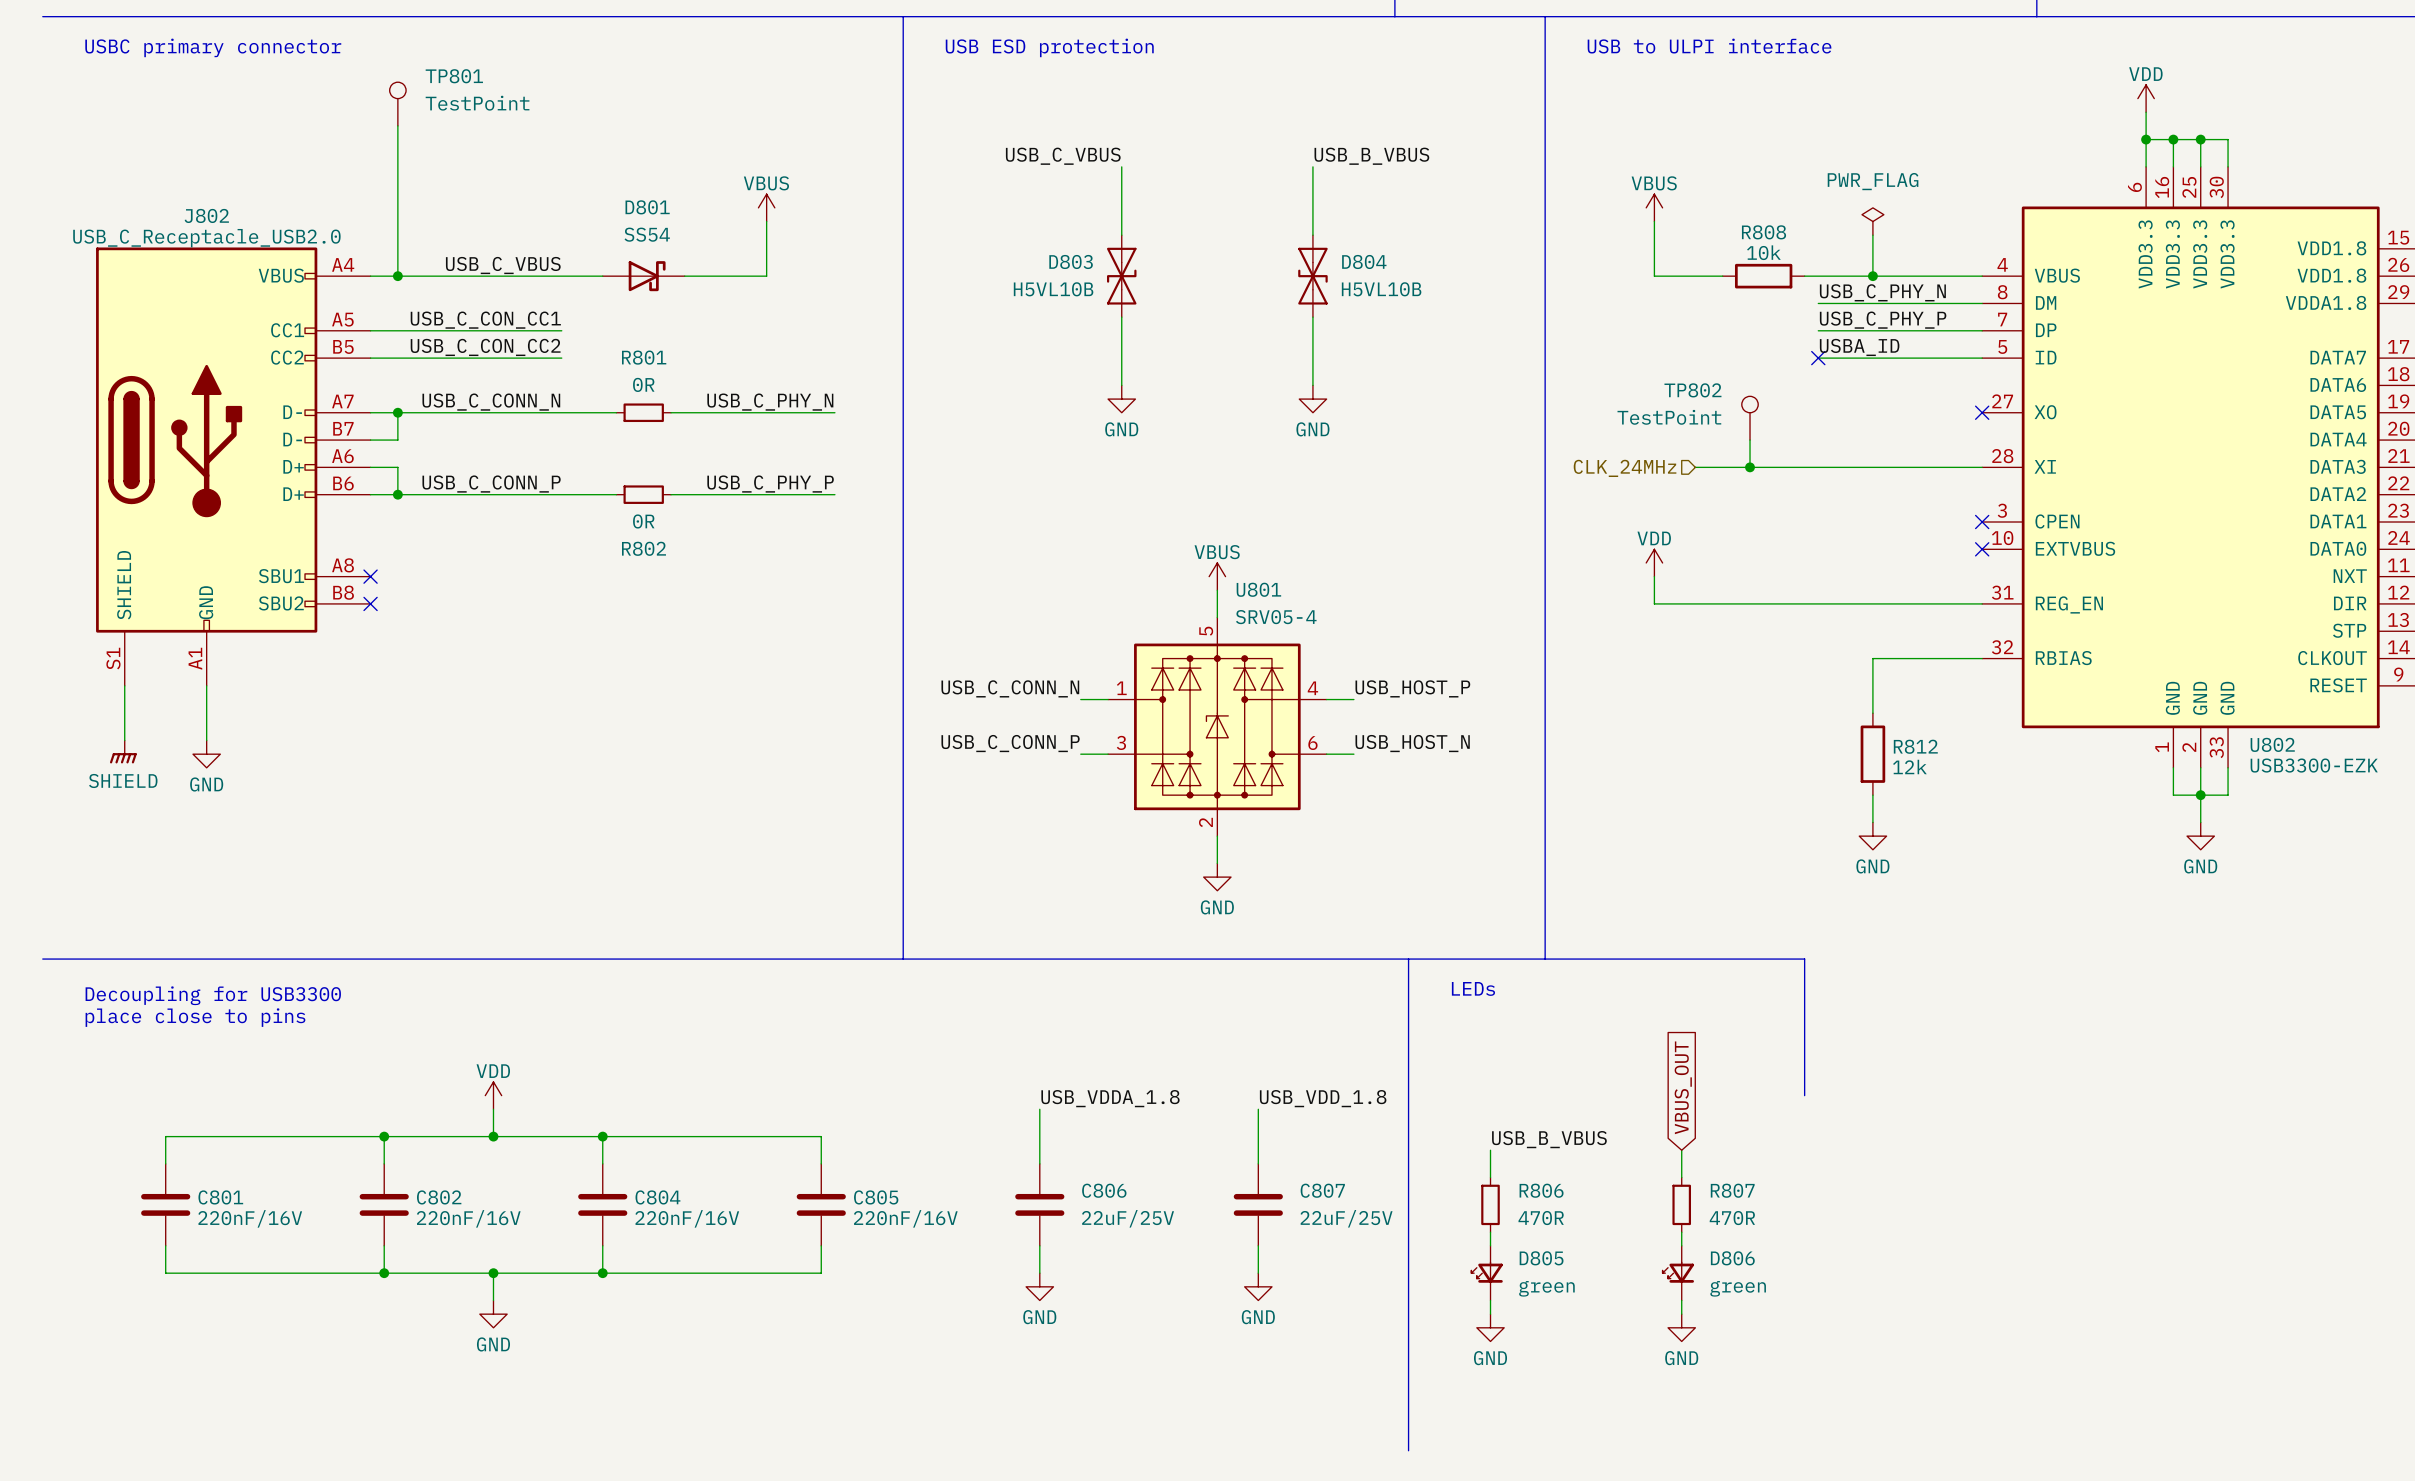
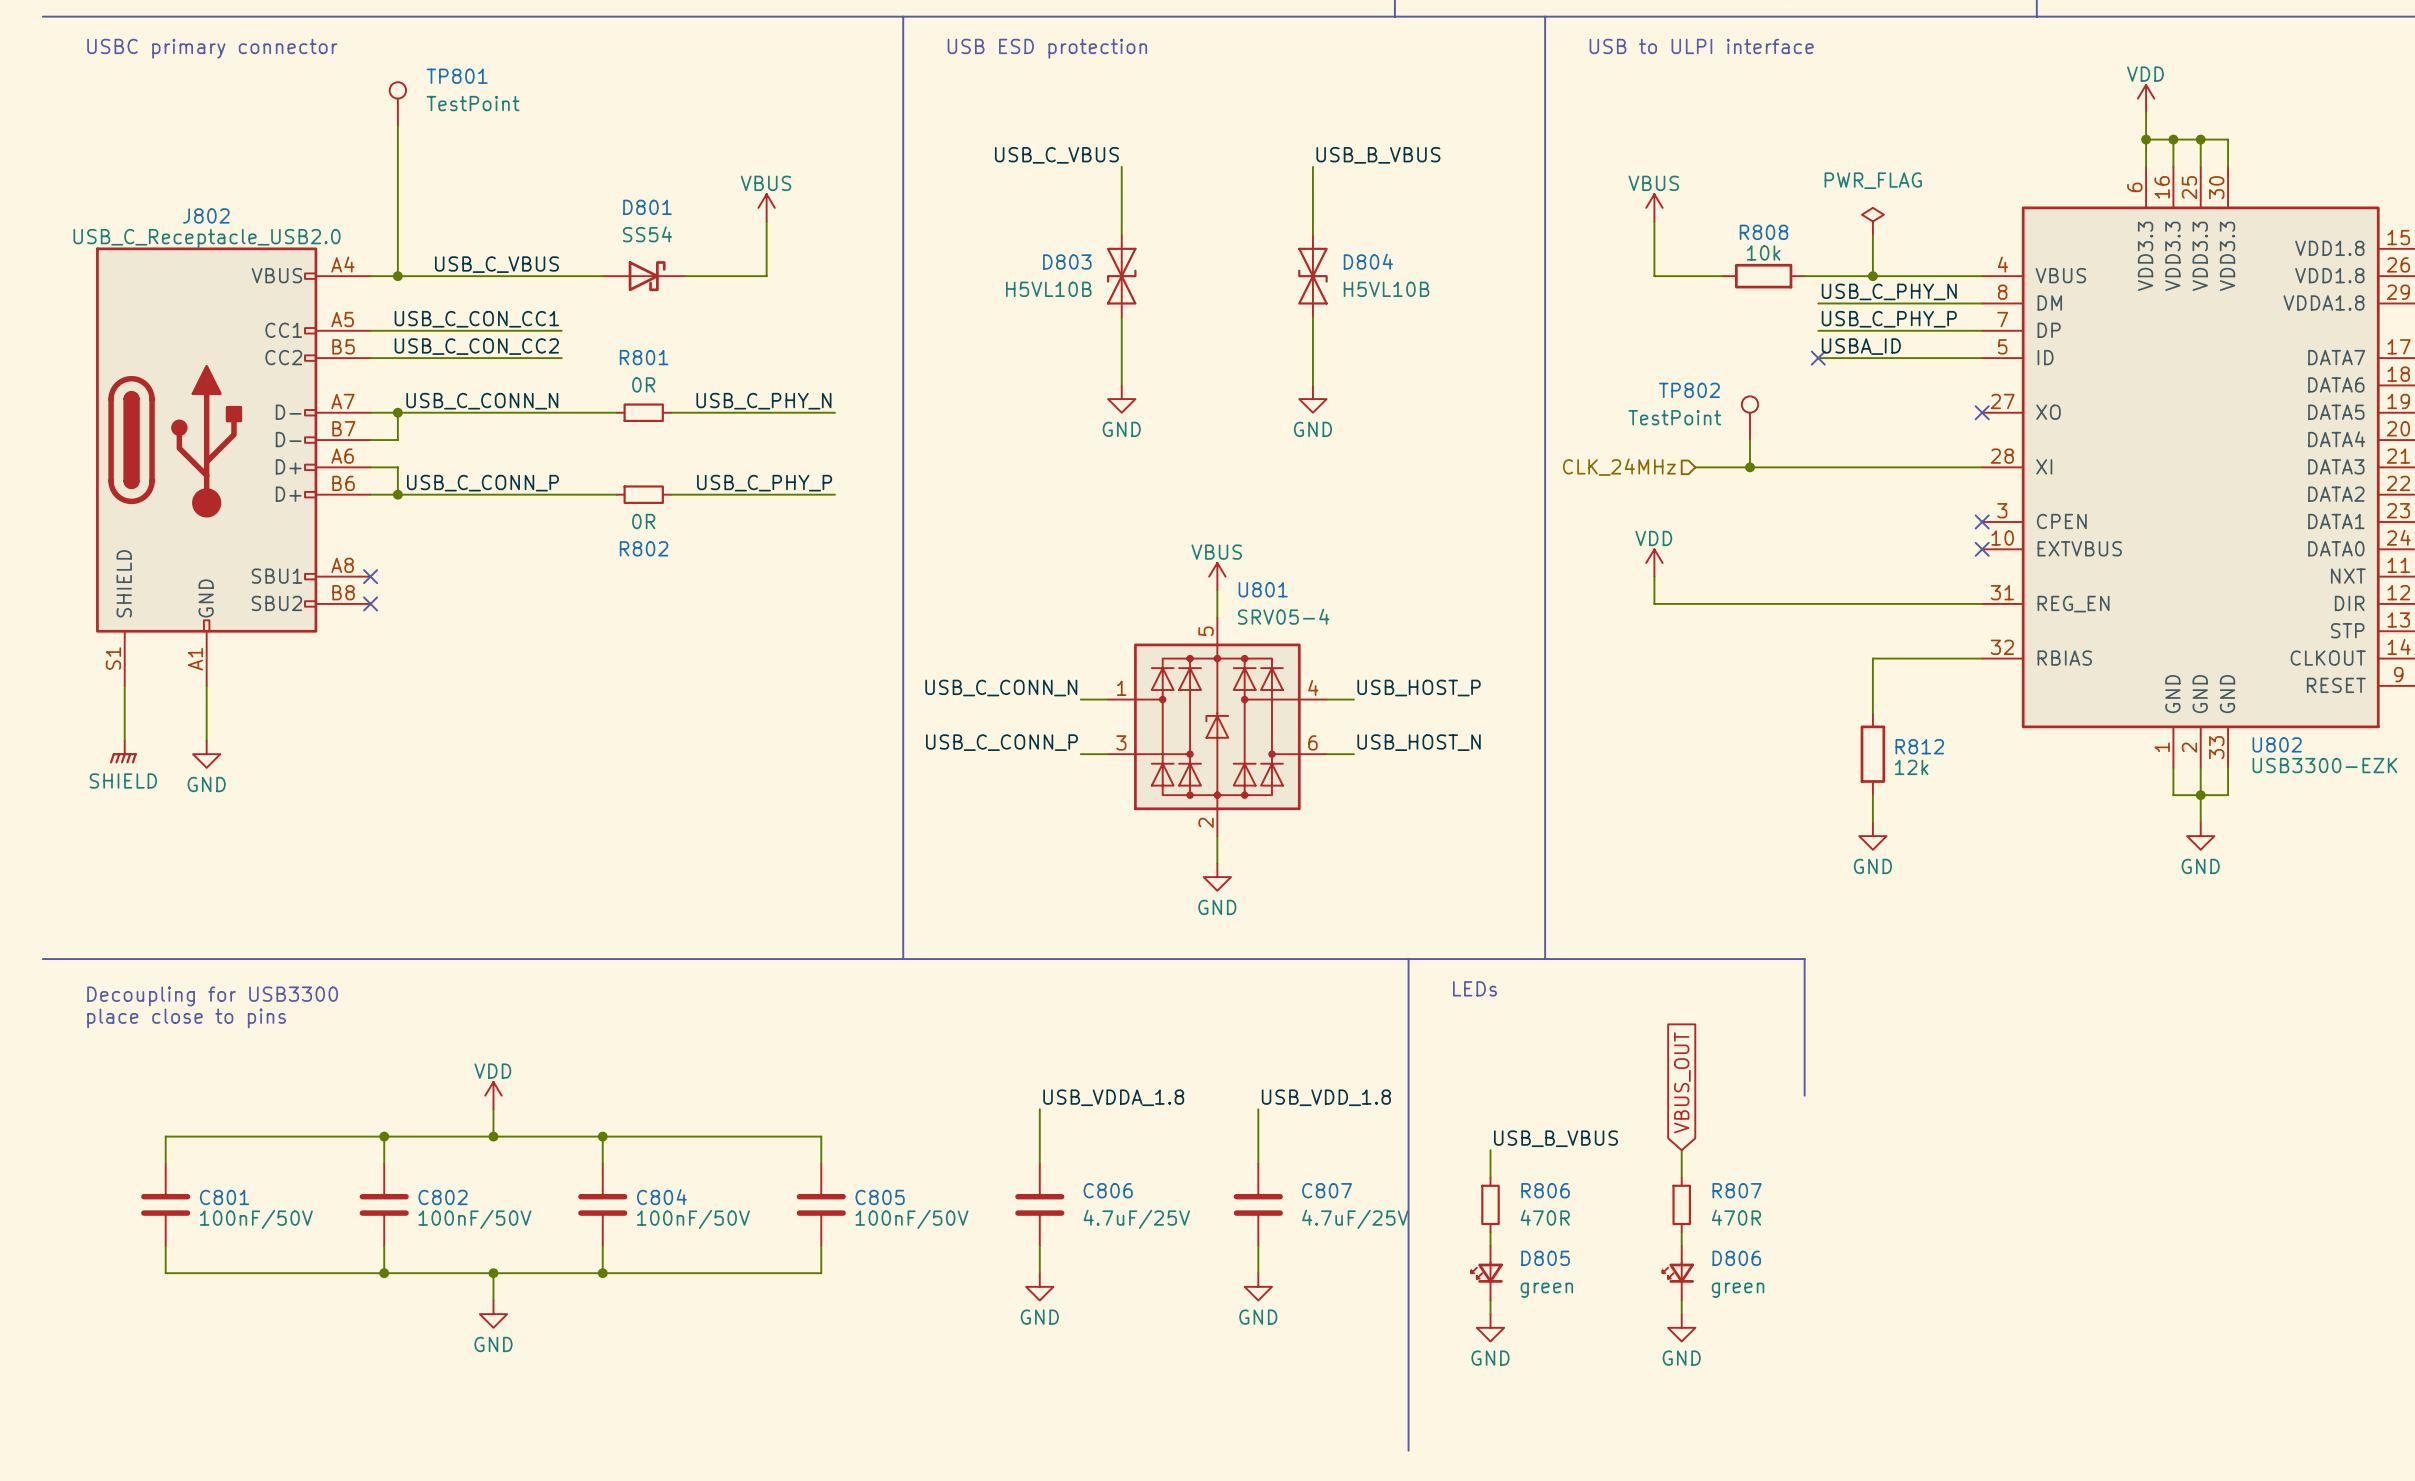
C801 value: 220nF/16V (250, 1218) -> 100nF/50V (256, 1219)
C802 value: 220nF/16V (468, 1218) -> 100nF/50V (474, 1219)
C804 value: 220nF/16V (687, 1218) -> 100nF/50V (693, 1219)
C805 value: 220nF/16V (905, 1218) -> 100nF/50V (911, 1219)
C806 value: 22uF/25V (1128, 1218) -> 4.7uF/25V (1136, 1219)
C807 value: 22uF/25V (1346, 1218) -> 4.7uF/25V (1355, 1219)

